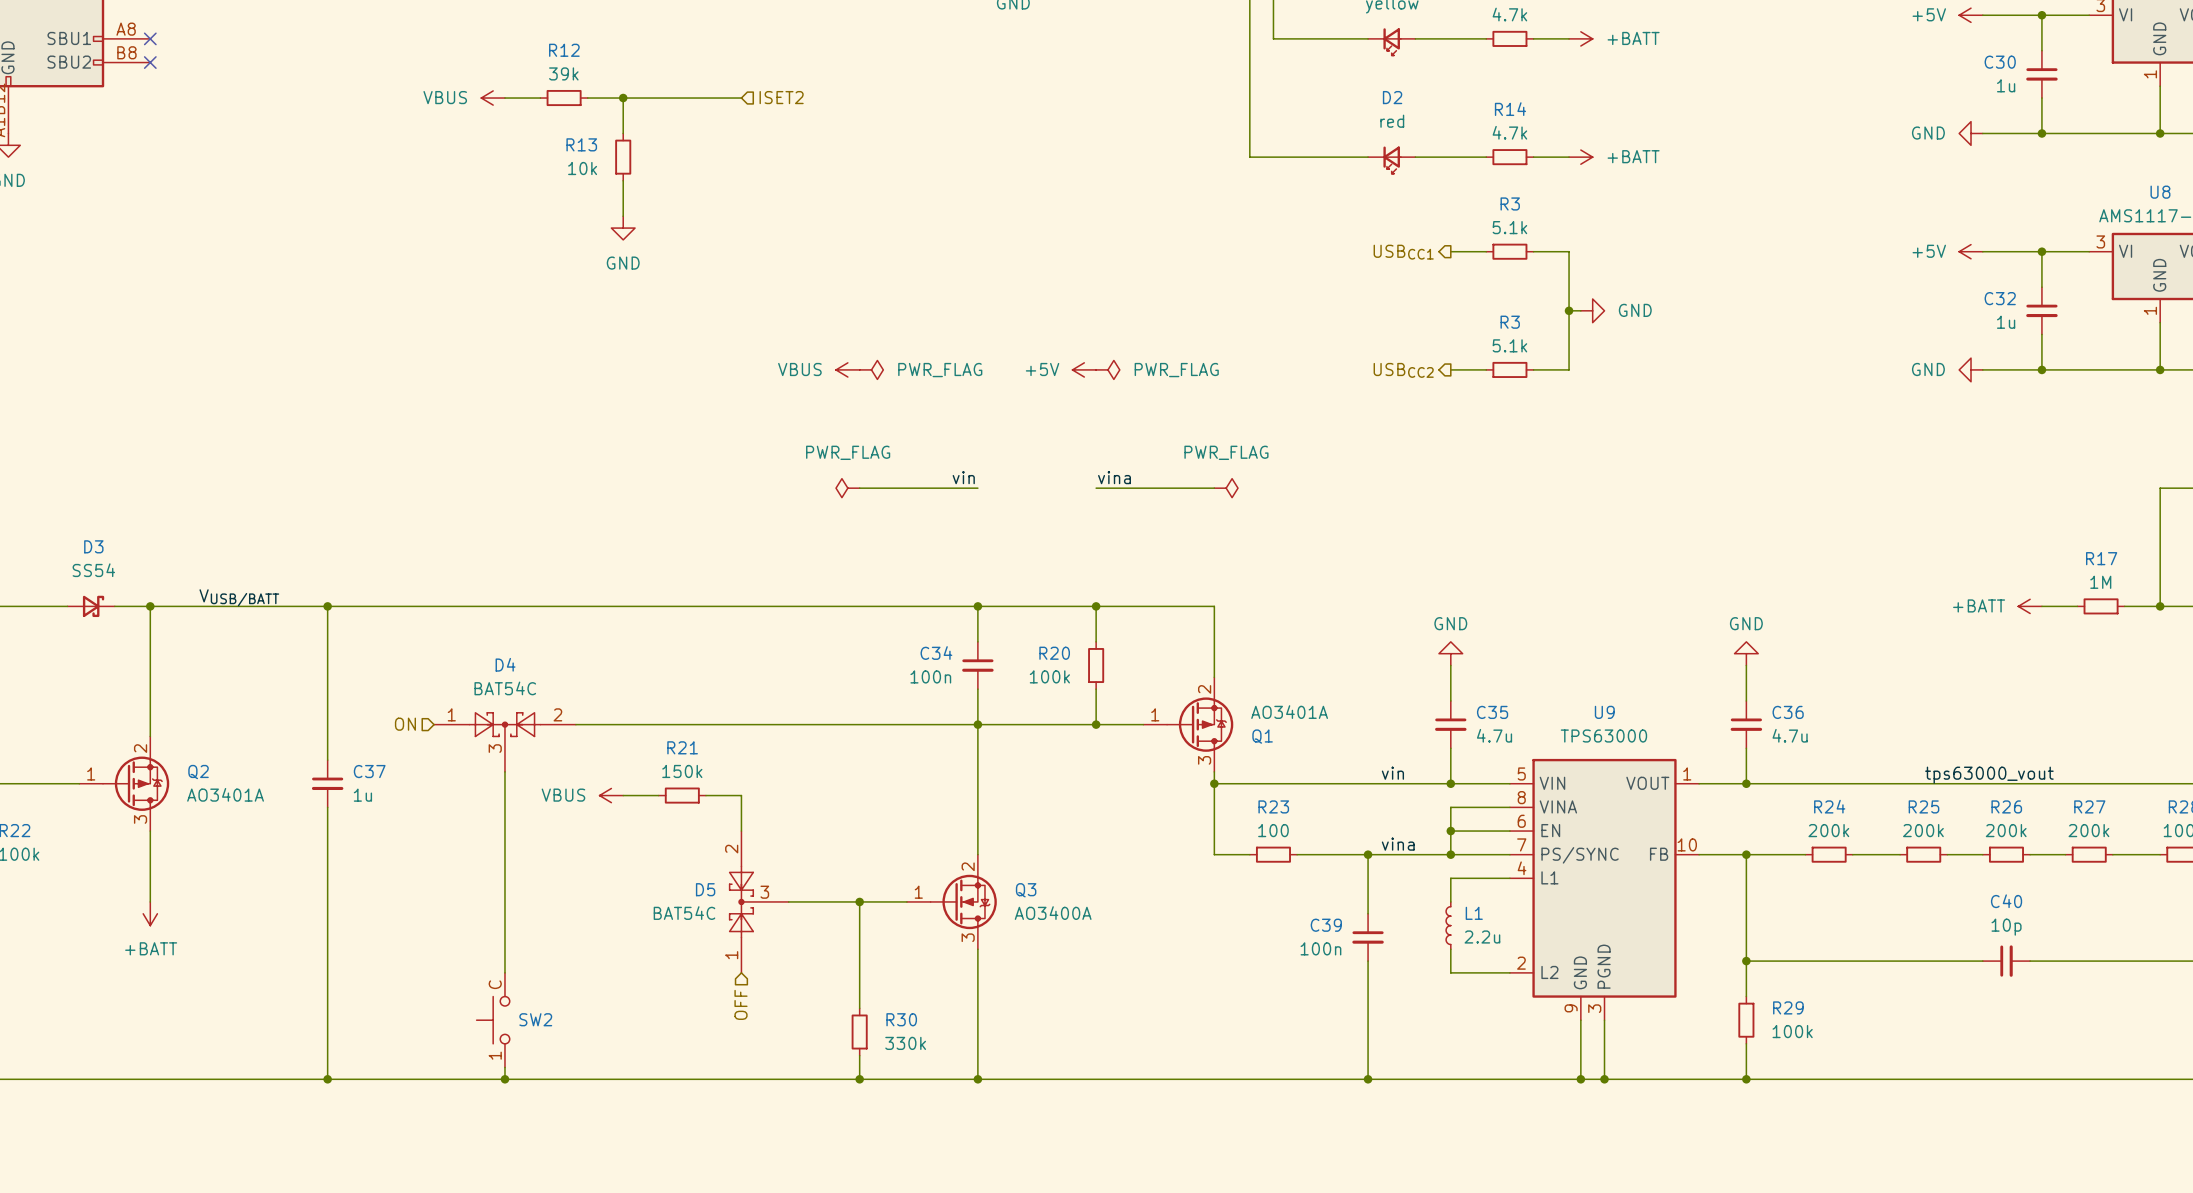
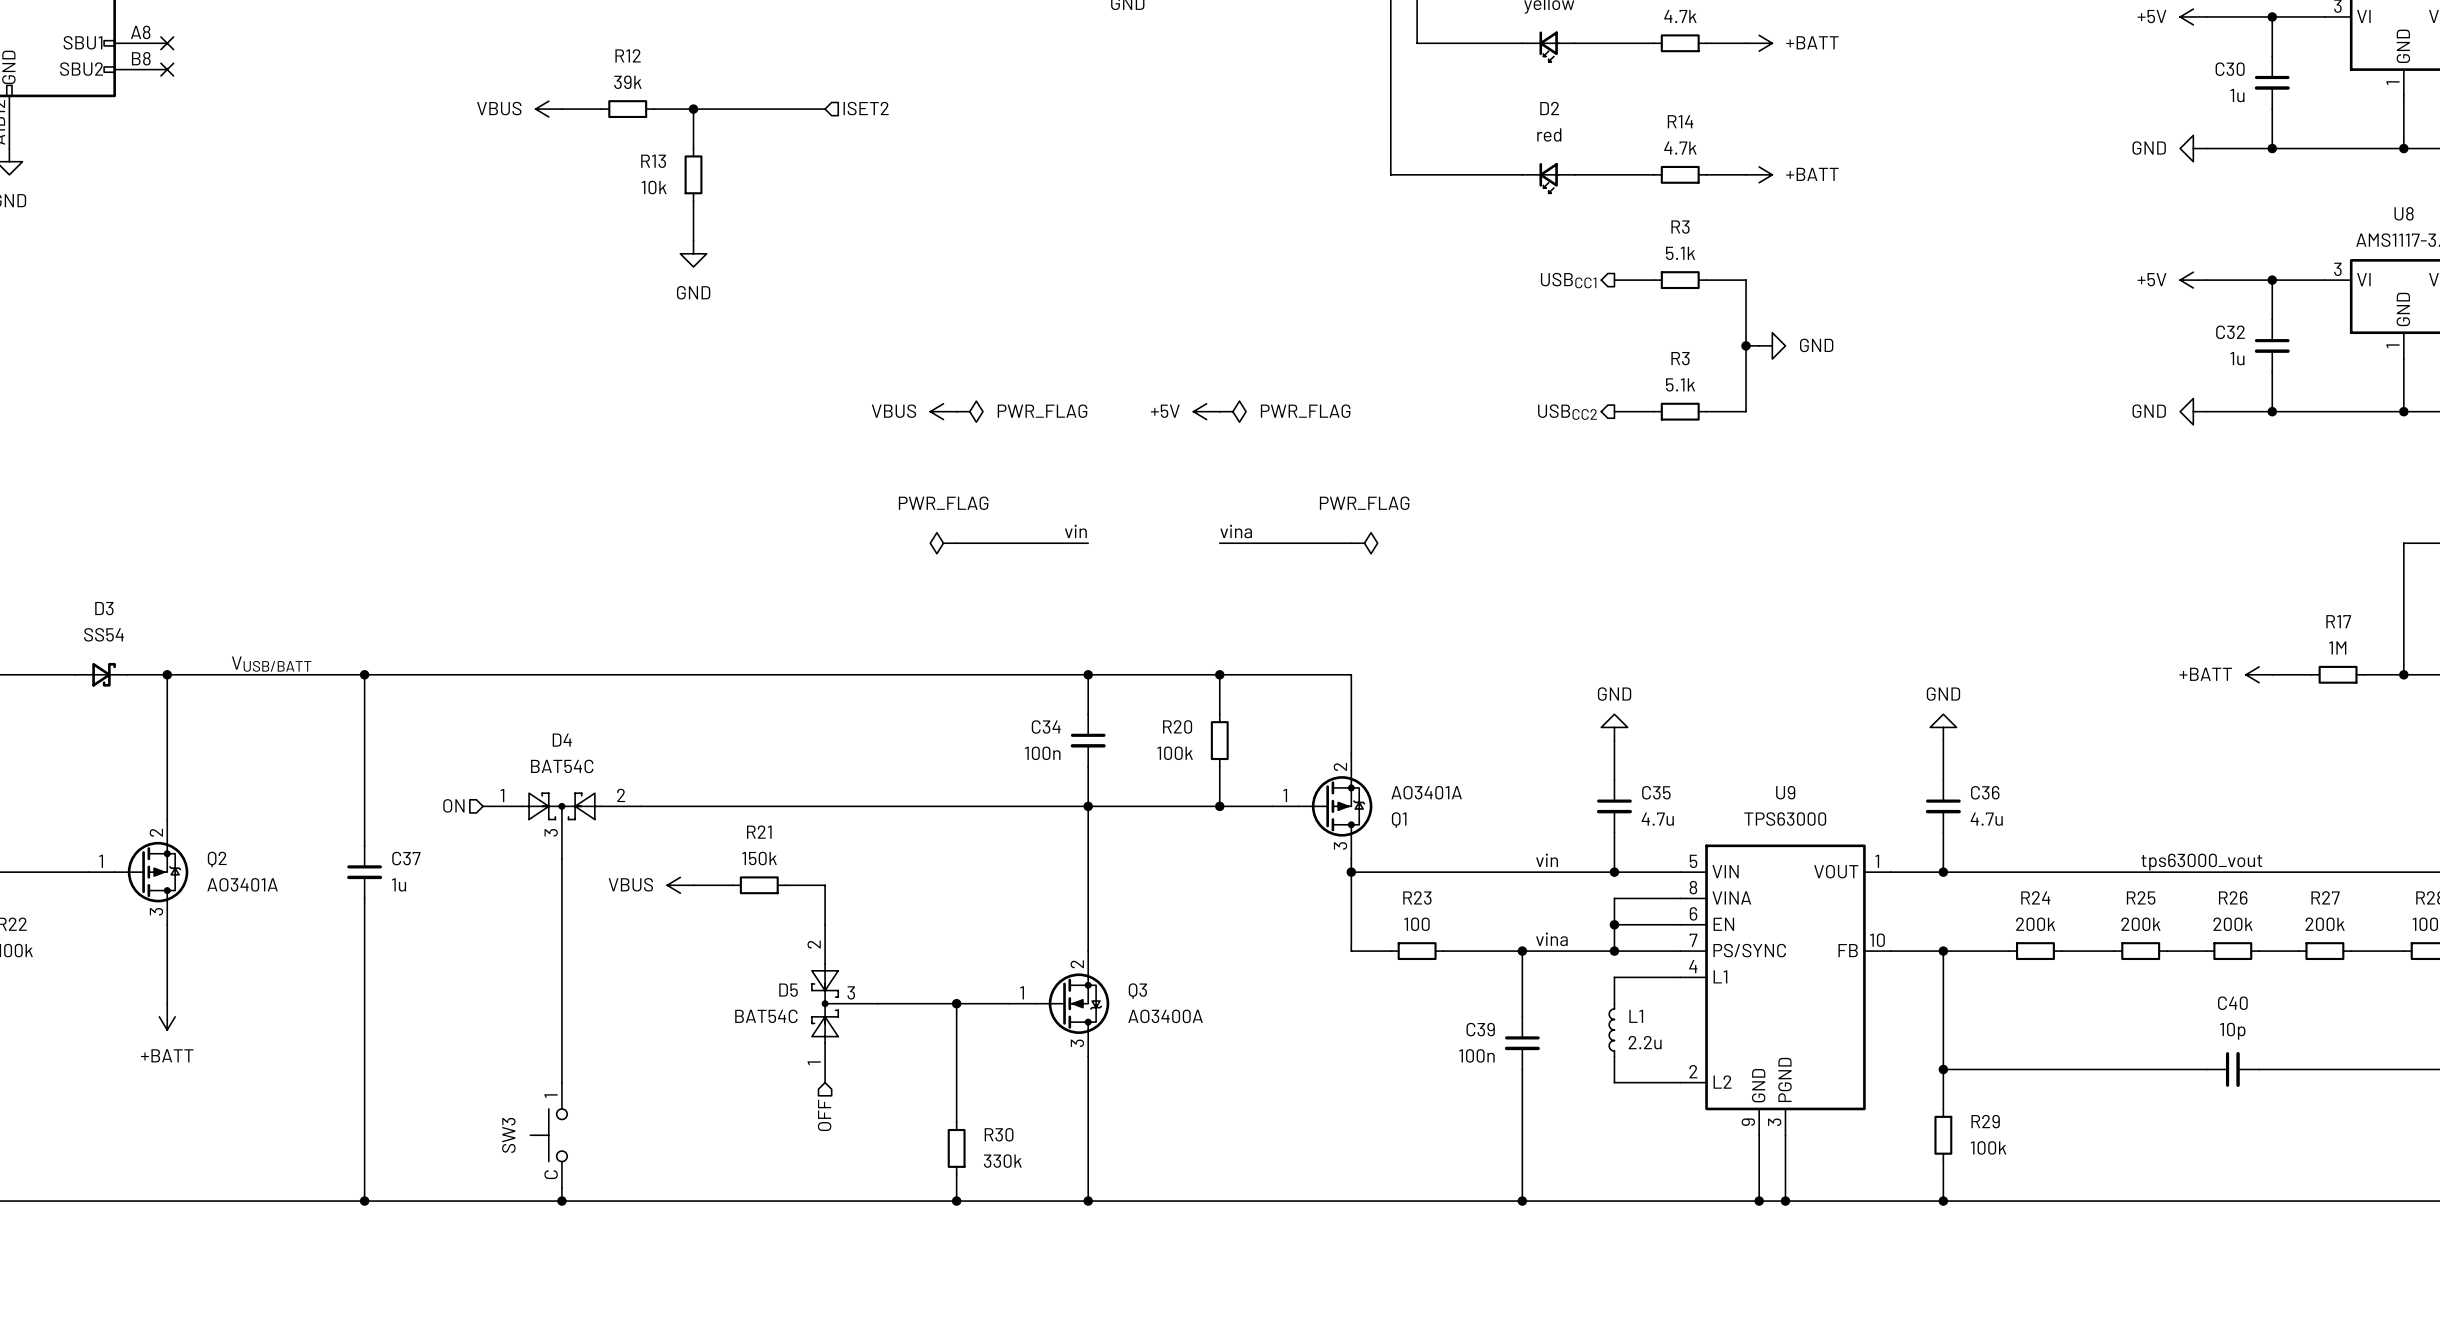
SW2 name: SW2 (535, 1019) -> SW3 (508, 1135)
SW2 flip: as is (493, 1020) -> up-down (548, 1135)

